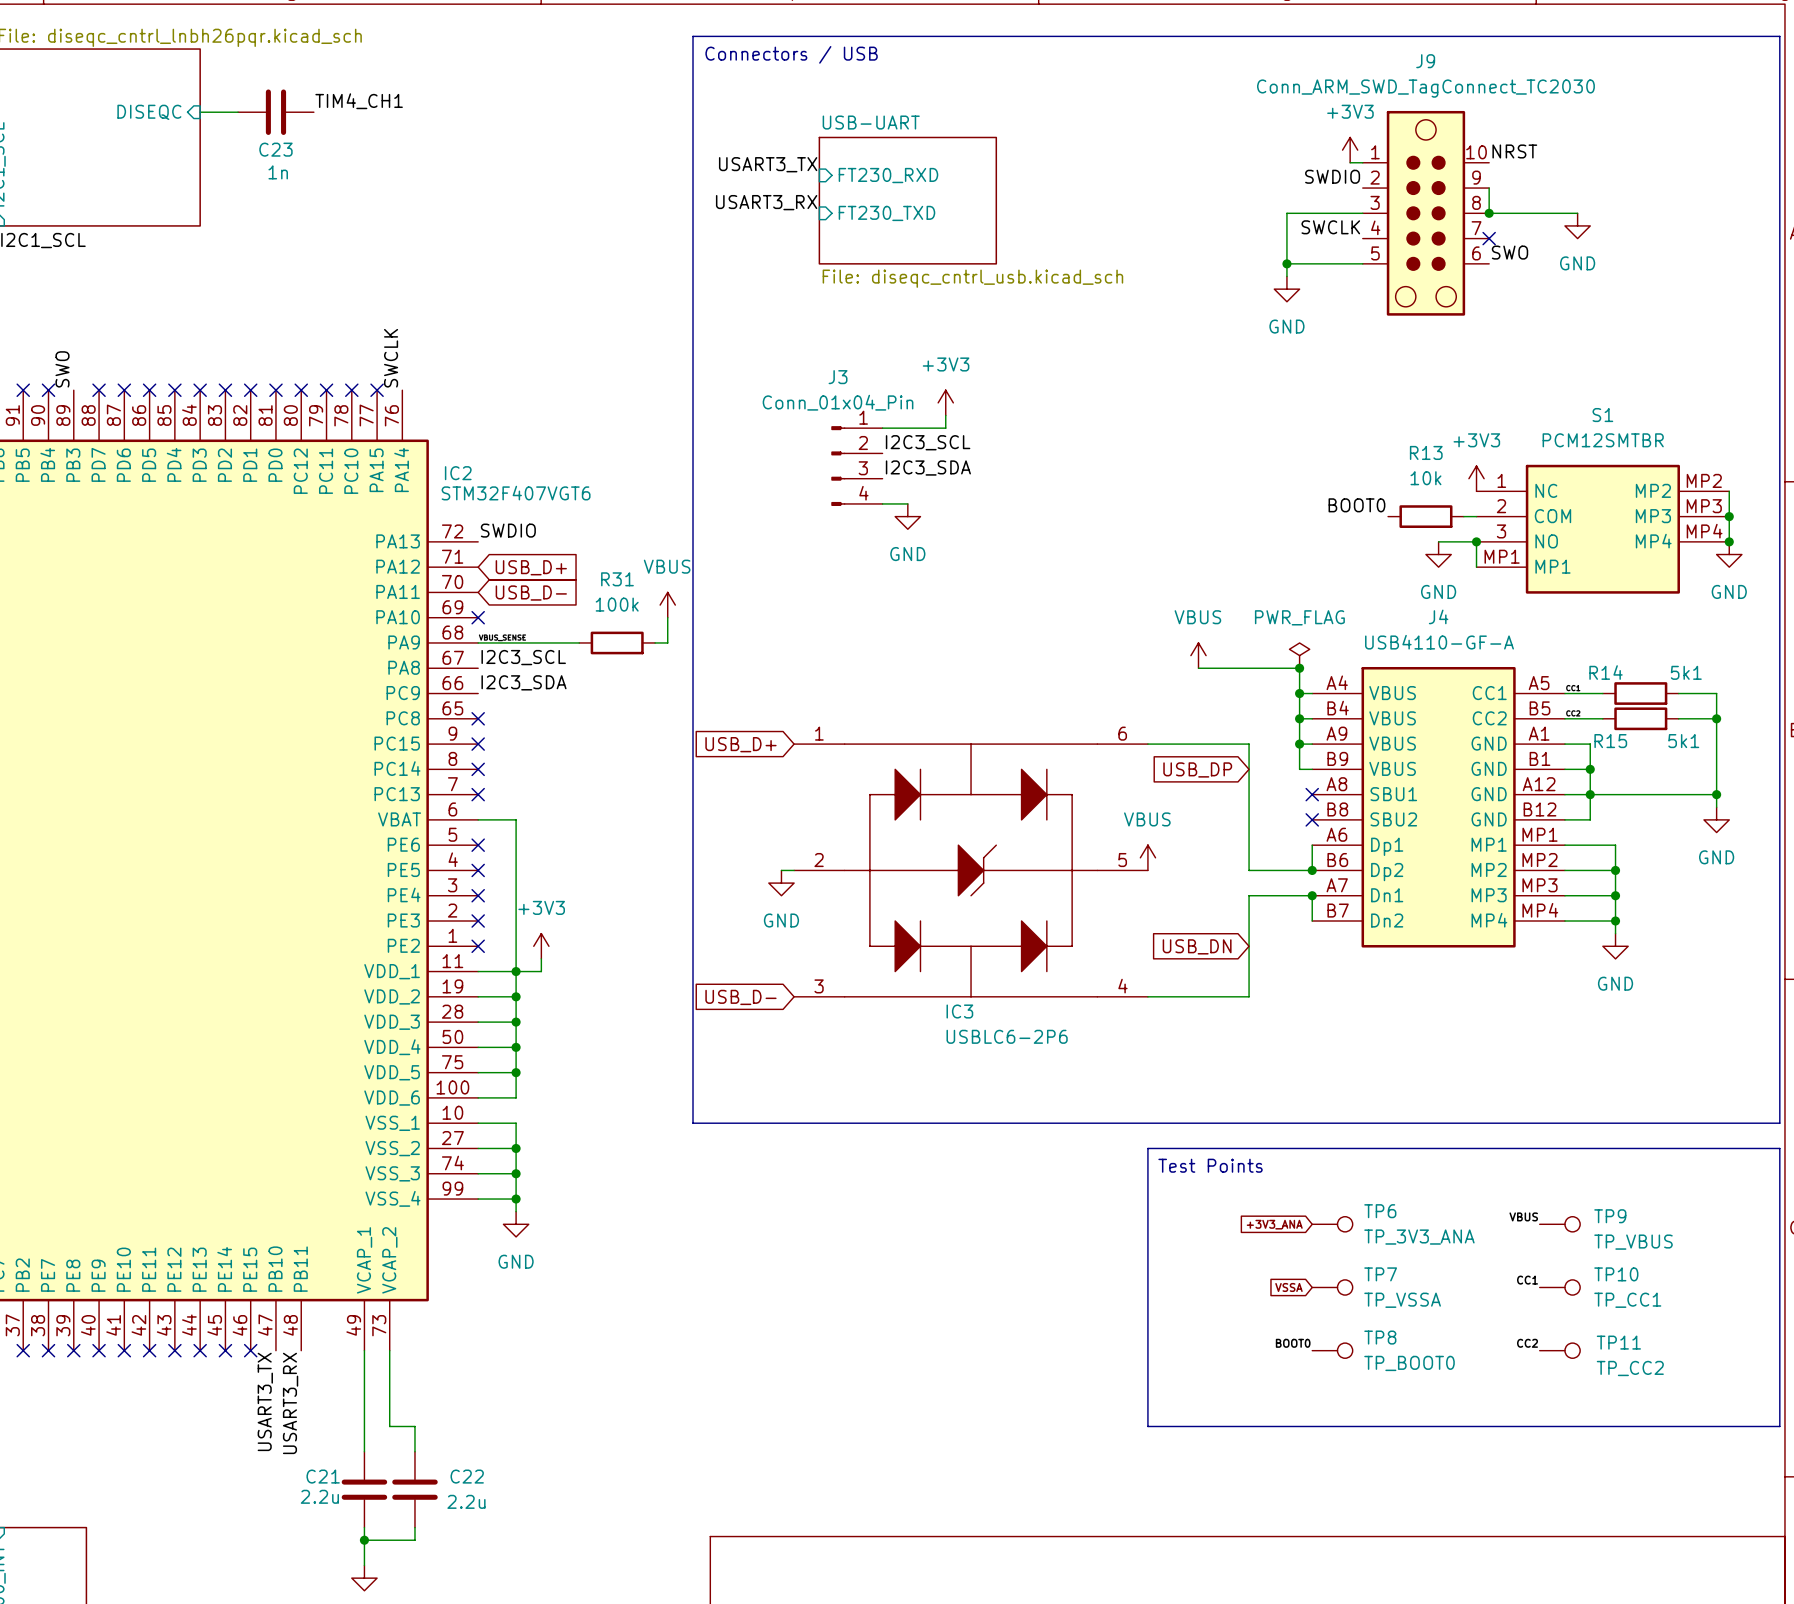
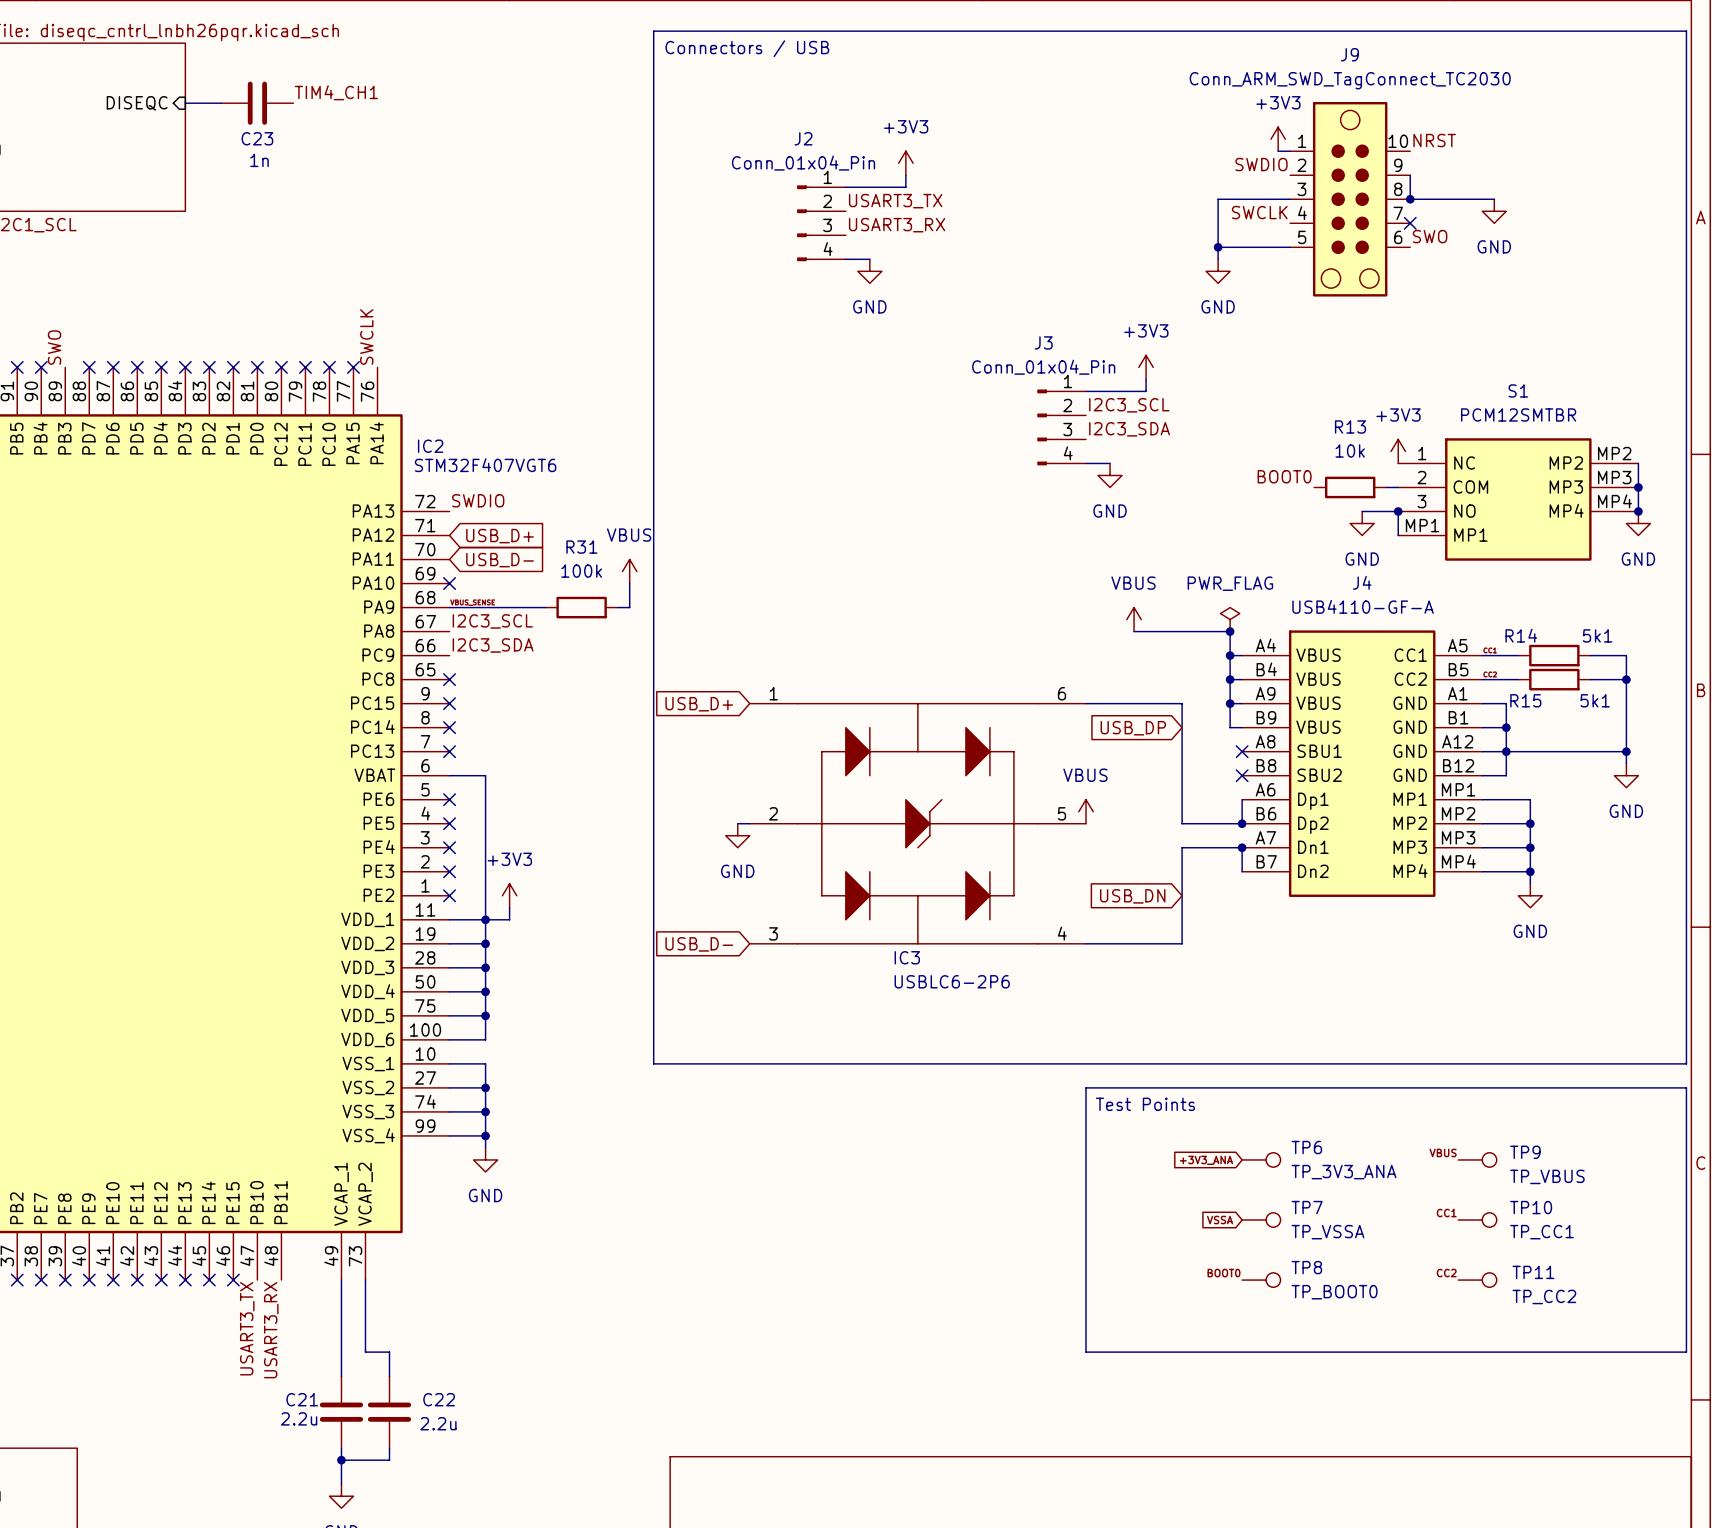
label position: USART3_TX (768, 164) -> USART3_TX (895, 201)
sheet pin: FT230_RXD (888, 175) -> none
power symbol: none -> +3V3 (905, 163)
sheet USB-UART: File: diseqc_cntrl_usb.kicad_sch (907, 200) -> none
label position: USART3_RX (766, 202) -> USART3_RX (897, 225)
sheet pin: FT230_TXD (886, 213) -> none
J2: none -> Conn_01x04_Pin (821, 223)
power symbol: none -> GND (869, 271)
power symbol: none -> +3V3 (1146, 367)
power symbol: +3V3 (945, 402) -> none
wire: none -> (1146, 379) (1146, 391) (1086, 391)
wire: (945, 415) (945, 428) (882, 428) -> (905, 175) (905, 187) (845, 187)
label: none -> I2C3_SCL (1129, 405)
label: I2C3_SCL (928, 442) -> none
label: none -> I2C3_SDA (1129, 429)
J3 position: (856, 466) -> (1061, 427)
label: I2C3_SDA (928, 468) -> none
wire: none -> (1086, 463) (1110, 463)
wire: (882, 503) (907, 503) -> (845, 259) (869, 259)
power symbol: none -> GND (1110, 475)
power symbol: GND (907, 516) -> none

